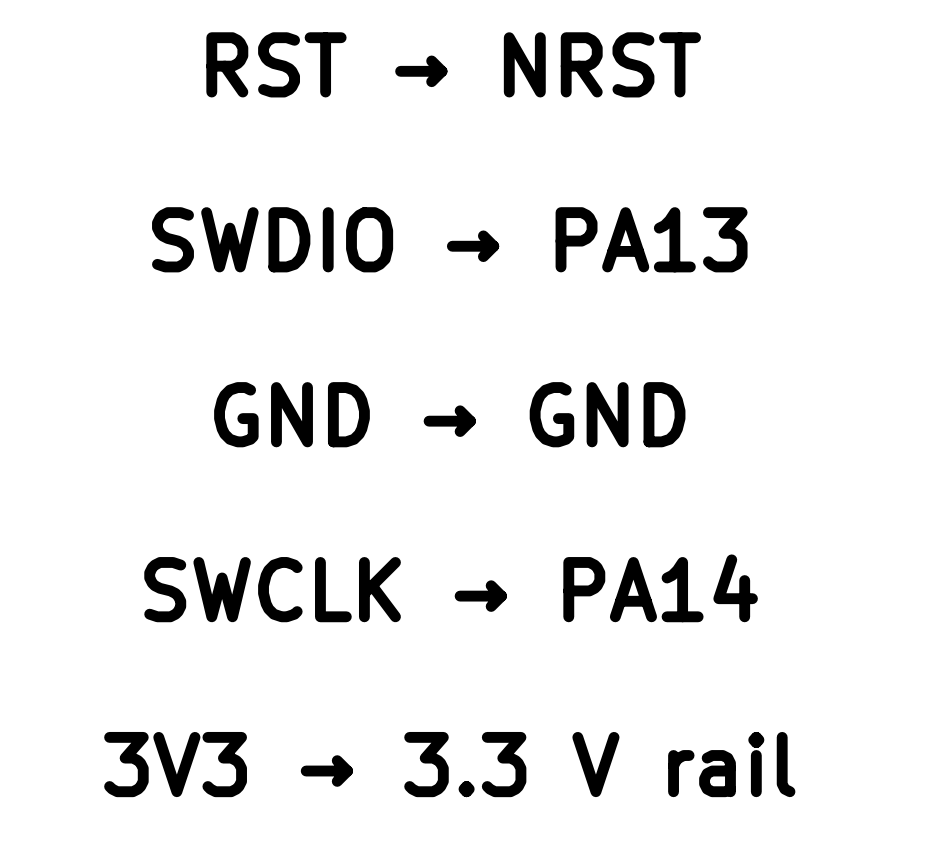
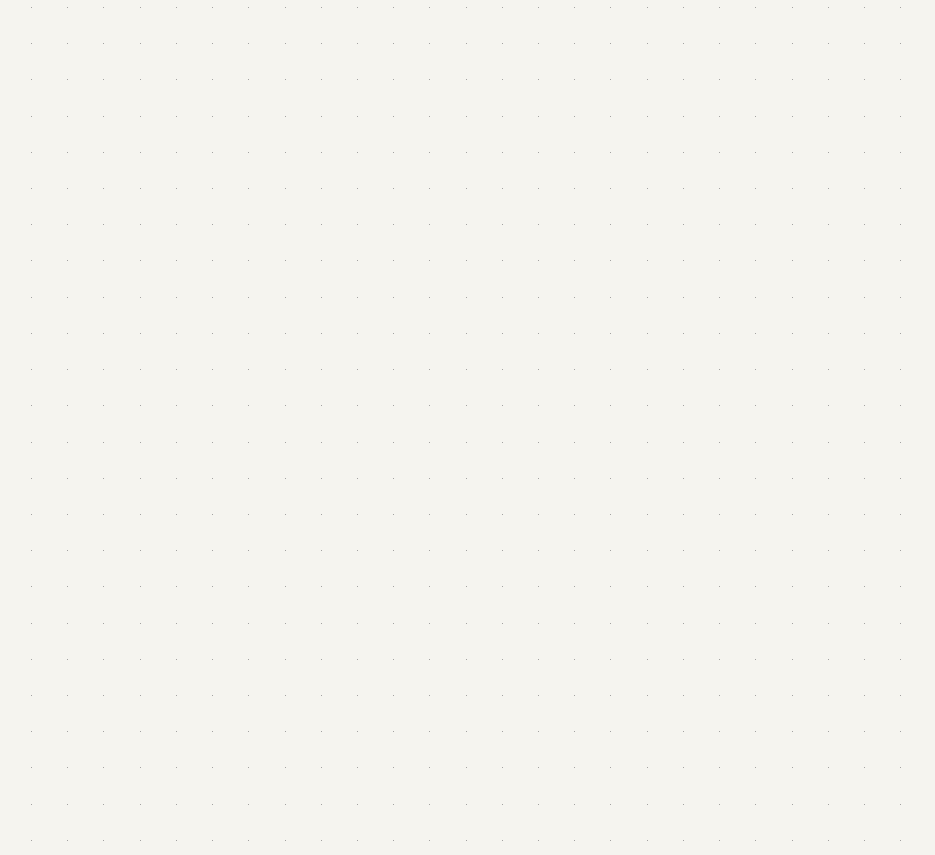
text: RST → NRST (453, 64) -> none
text: SWDIO → PA13 (449, 239) -> none
text: GND → GND (449, 414) -> none
text: SWCLK → PA14 (451, 588) -> none
text: 3V3 → 3.3 V rail (449, 764) -> none

